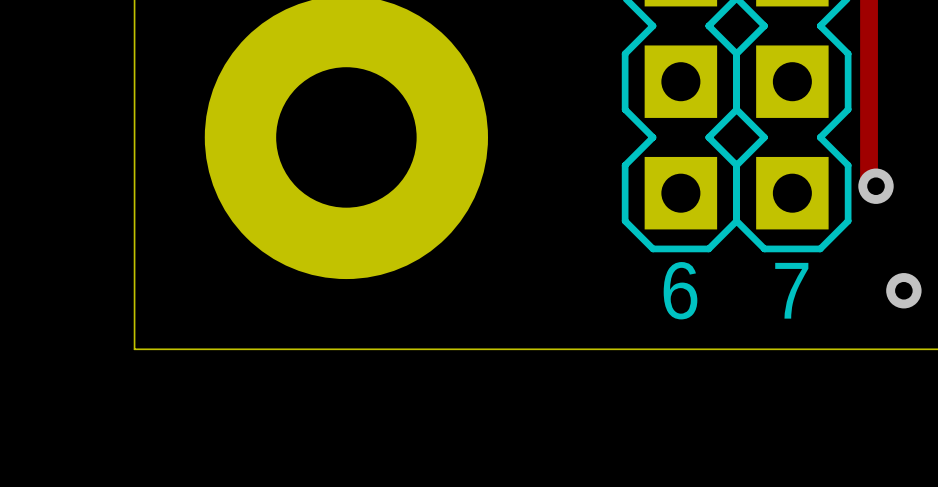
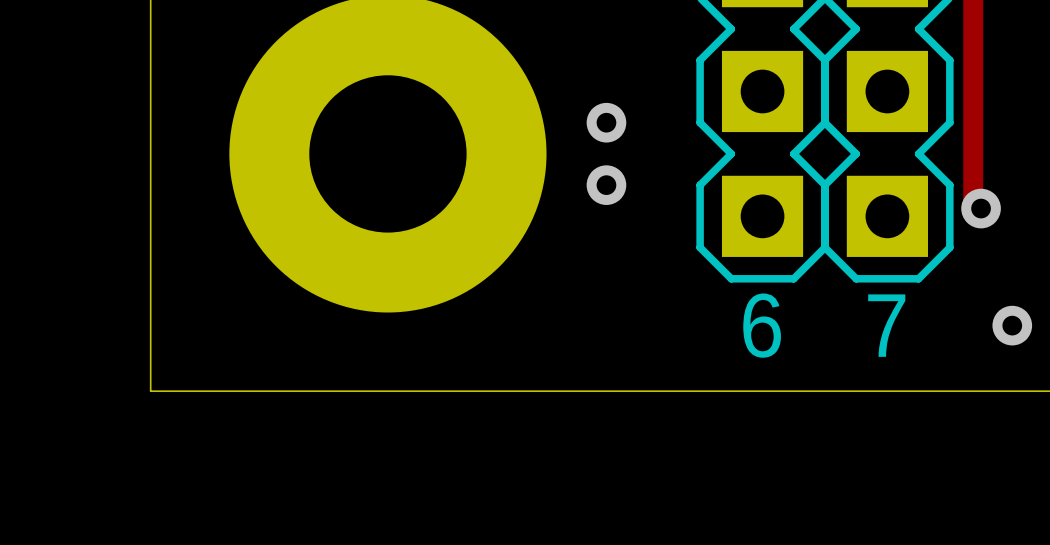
via: none -> (606, 122)
via: none -> (606, 185)

